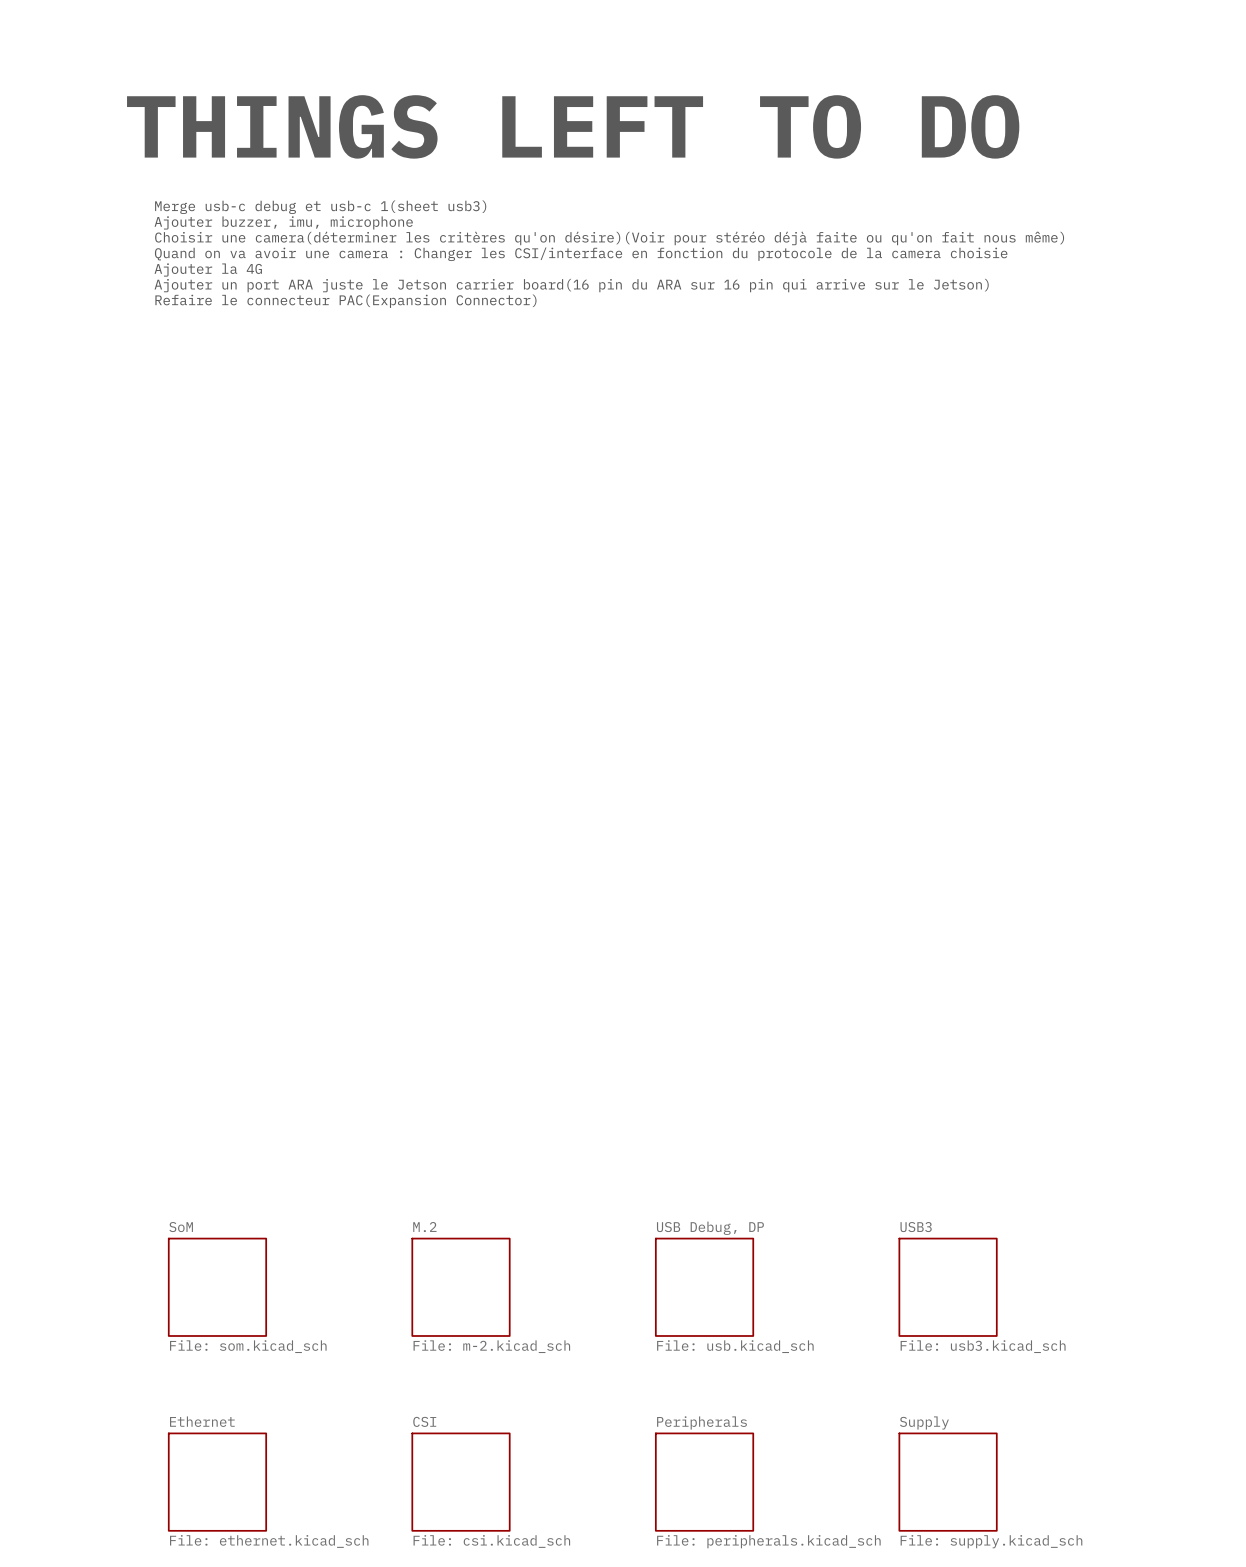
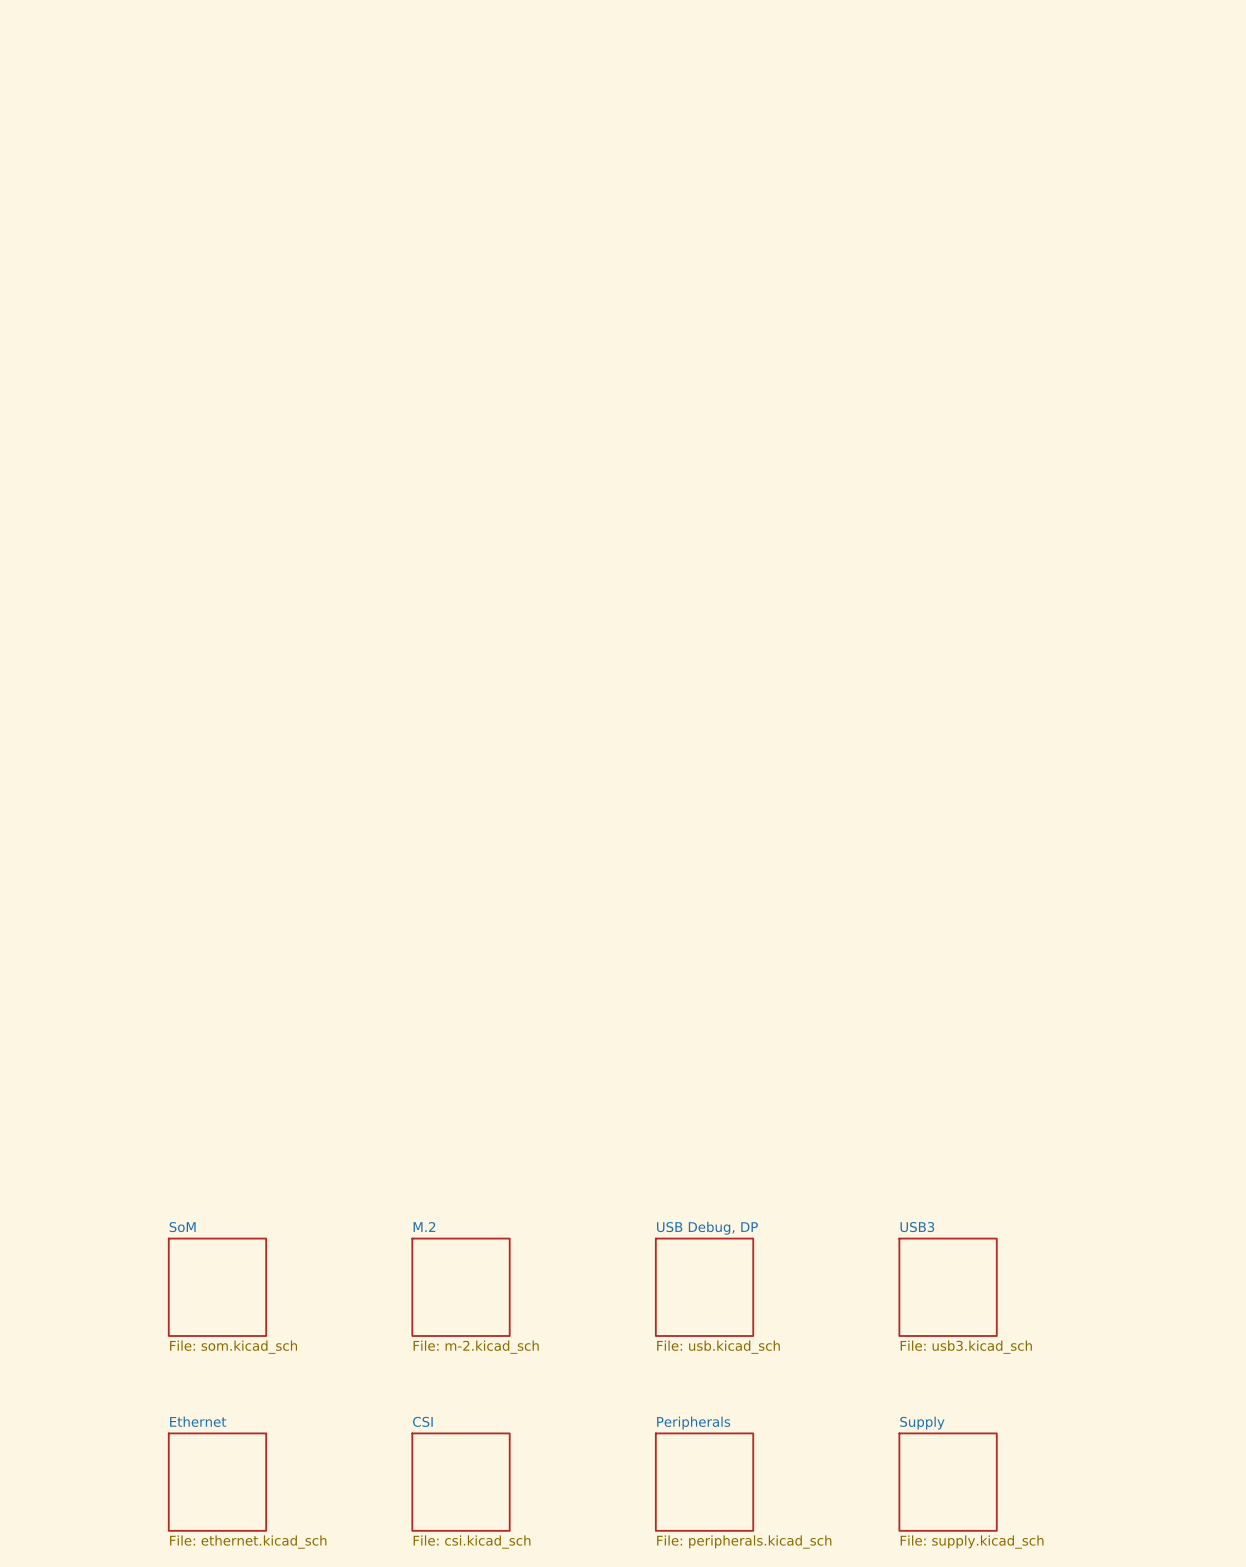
text: THINGS LEFT TO DO (573, 126) -> none
text: Merge usb-c debug et usb-c 1(sheet usb3) (320, 207) -> none
text: Ajouter buzzer, imu, microphone (283, 222) -> none
text: Choisir une camera(déterminer les critères qu'on désire)(Voir pour stéréo déjà faite ou qu'on fait nous même) (609, 238) -> none
text: Quand on va avoir une camera : Changer les CSI/interface en fonction du protocole de la camera choisie (581, 254) -> none
text: Ajouter la 4G (208, 269) -> none
text: Ajouter un port ARA juste le Jetson carrier board(16 pin du ARA sur 16 pin qui arrive sur le Jetson) (571, 285) -> none
text: Refaire le connecteur PAC(Expansion Connector) (345, 301) -> none

